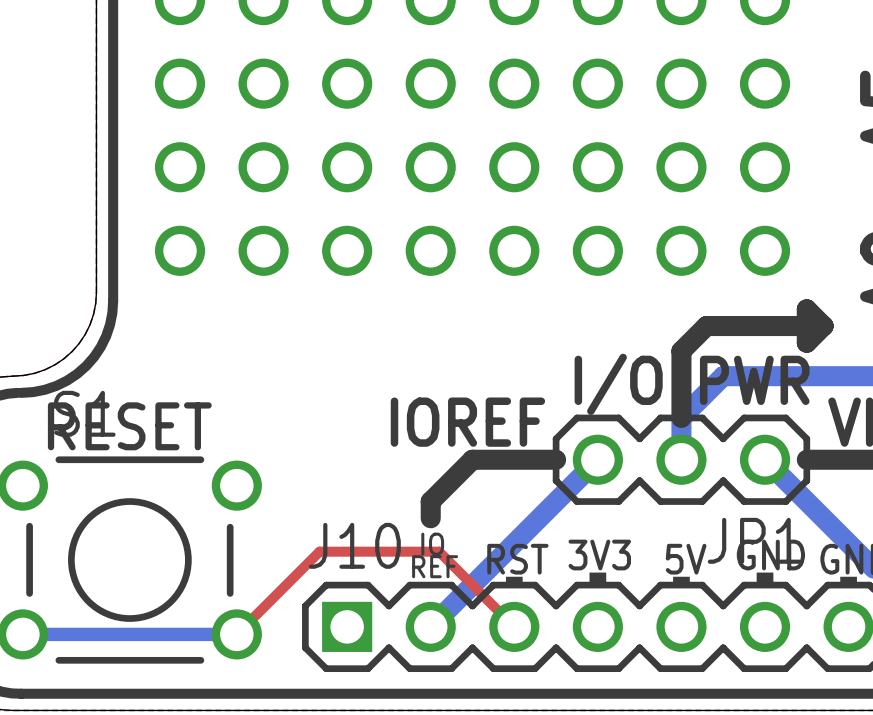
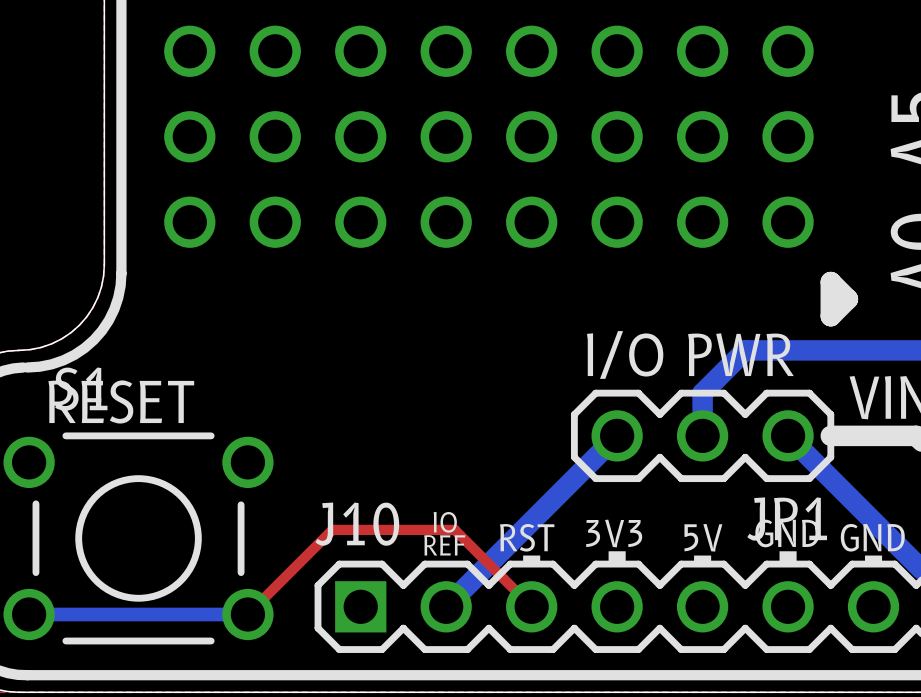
line: (823, 326) (706, 326) (681, 351) (681, 417) -> none
text: IOREF (467, 422) -> none
line: (556, 459) (472, 459) (430, 501) (430, 518) -> none

